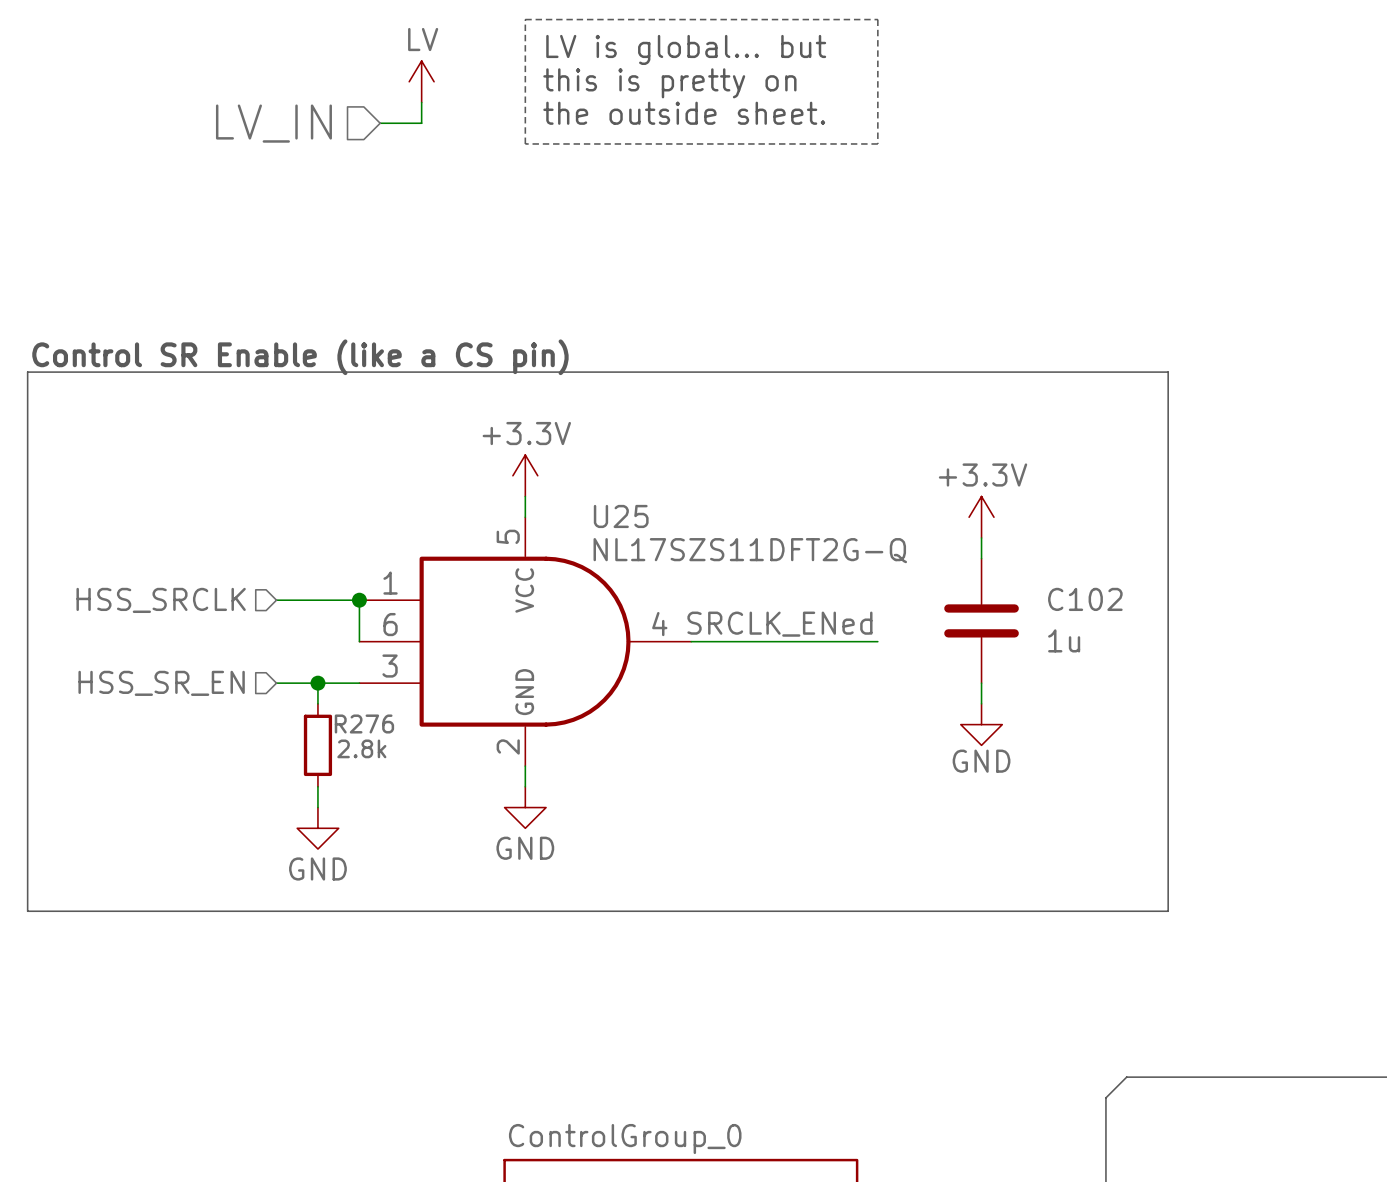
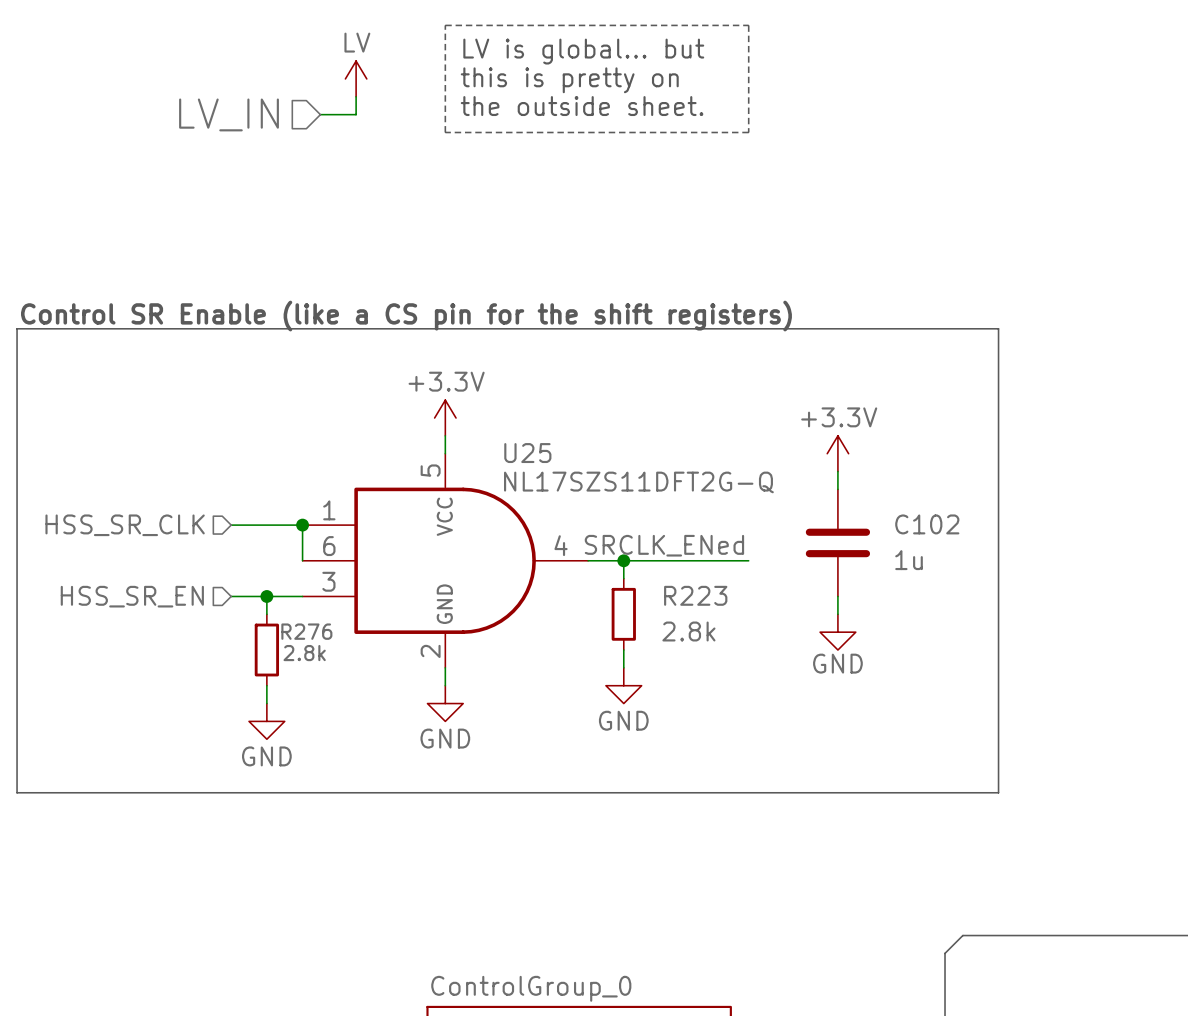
text: Control SR Enable (like a CS pin) (300, 357) -> Control SR Enable (like a CS pin for the shift registers) (406, 316)
hierarchical label: HSS_SRCLK (161, 600) -> HSS_SR_CLK (125, 525)
wire: none -> (623, 560) (623, 578)
junction: none -> (623, 560)
R223: none -> 2.8k (623, 614)
wire: none -> (623, 650) (623, 667)
power symbol: none -> GND (623, 685)

